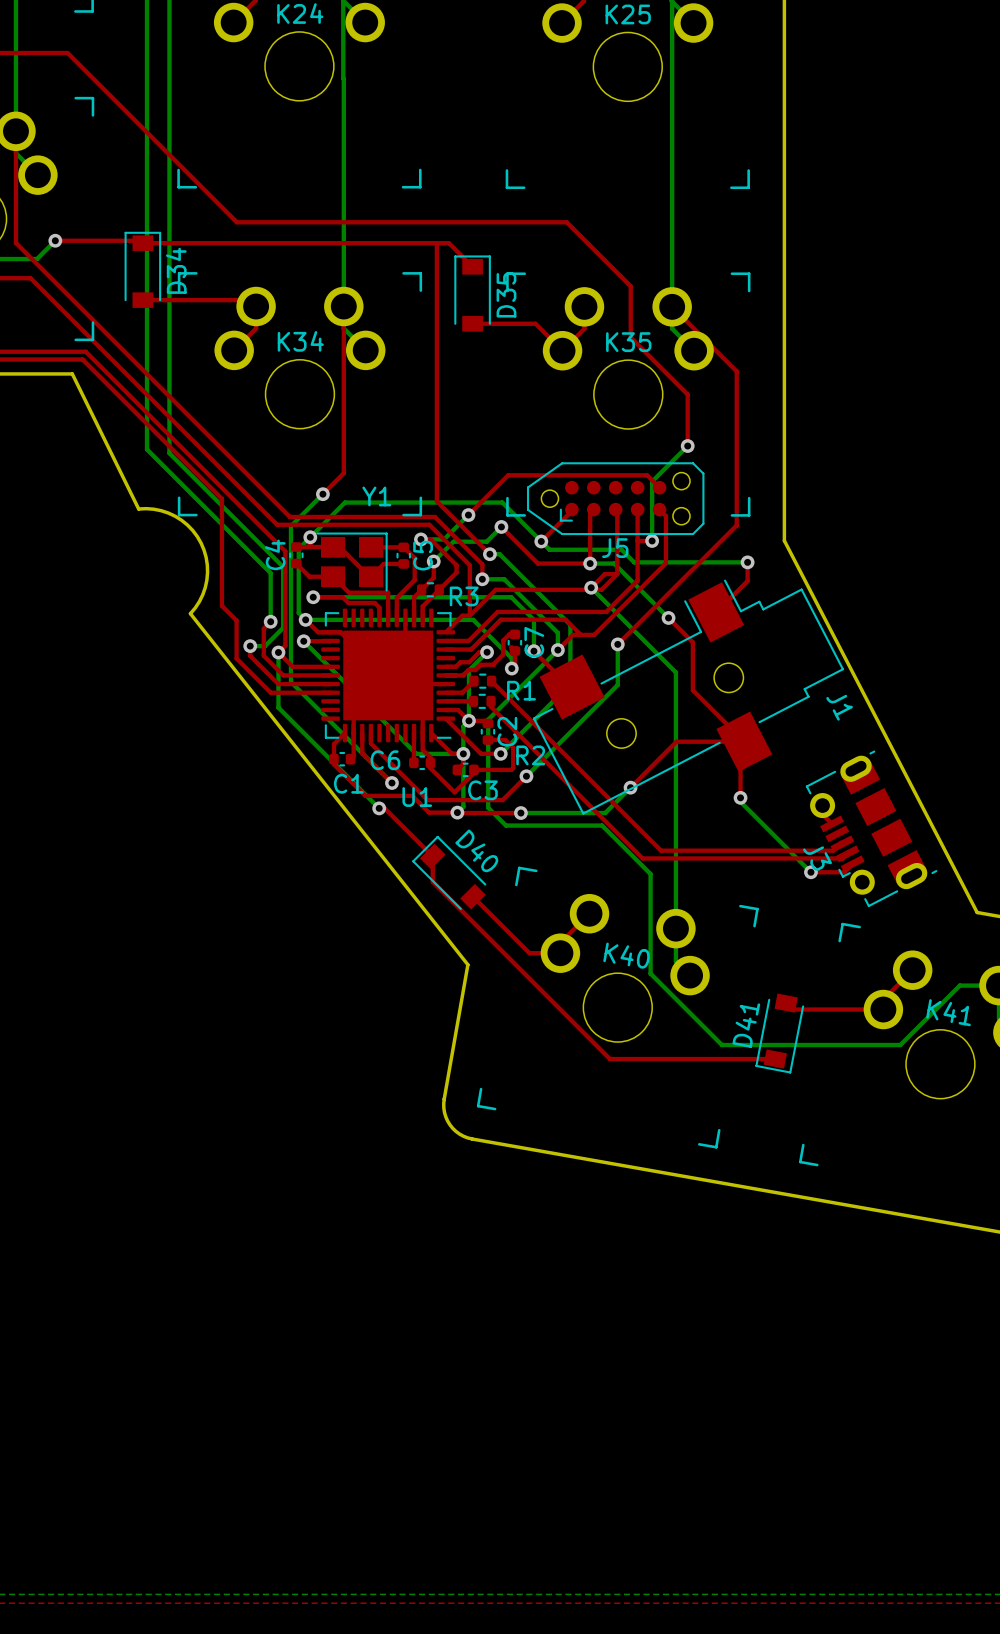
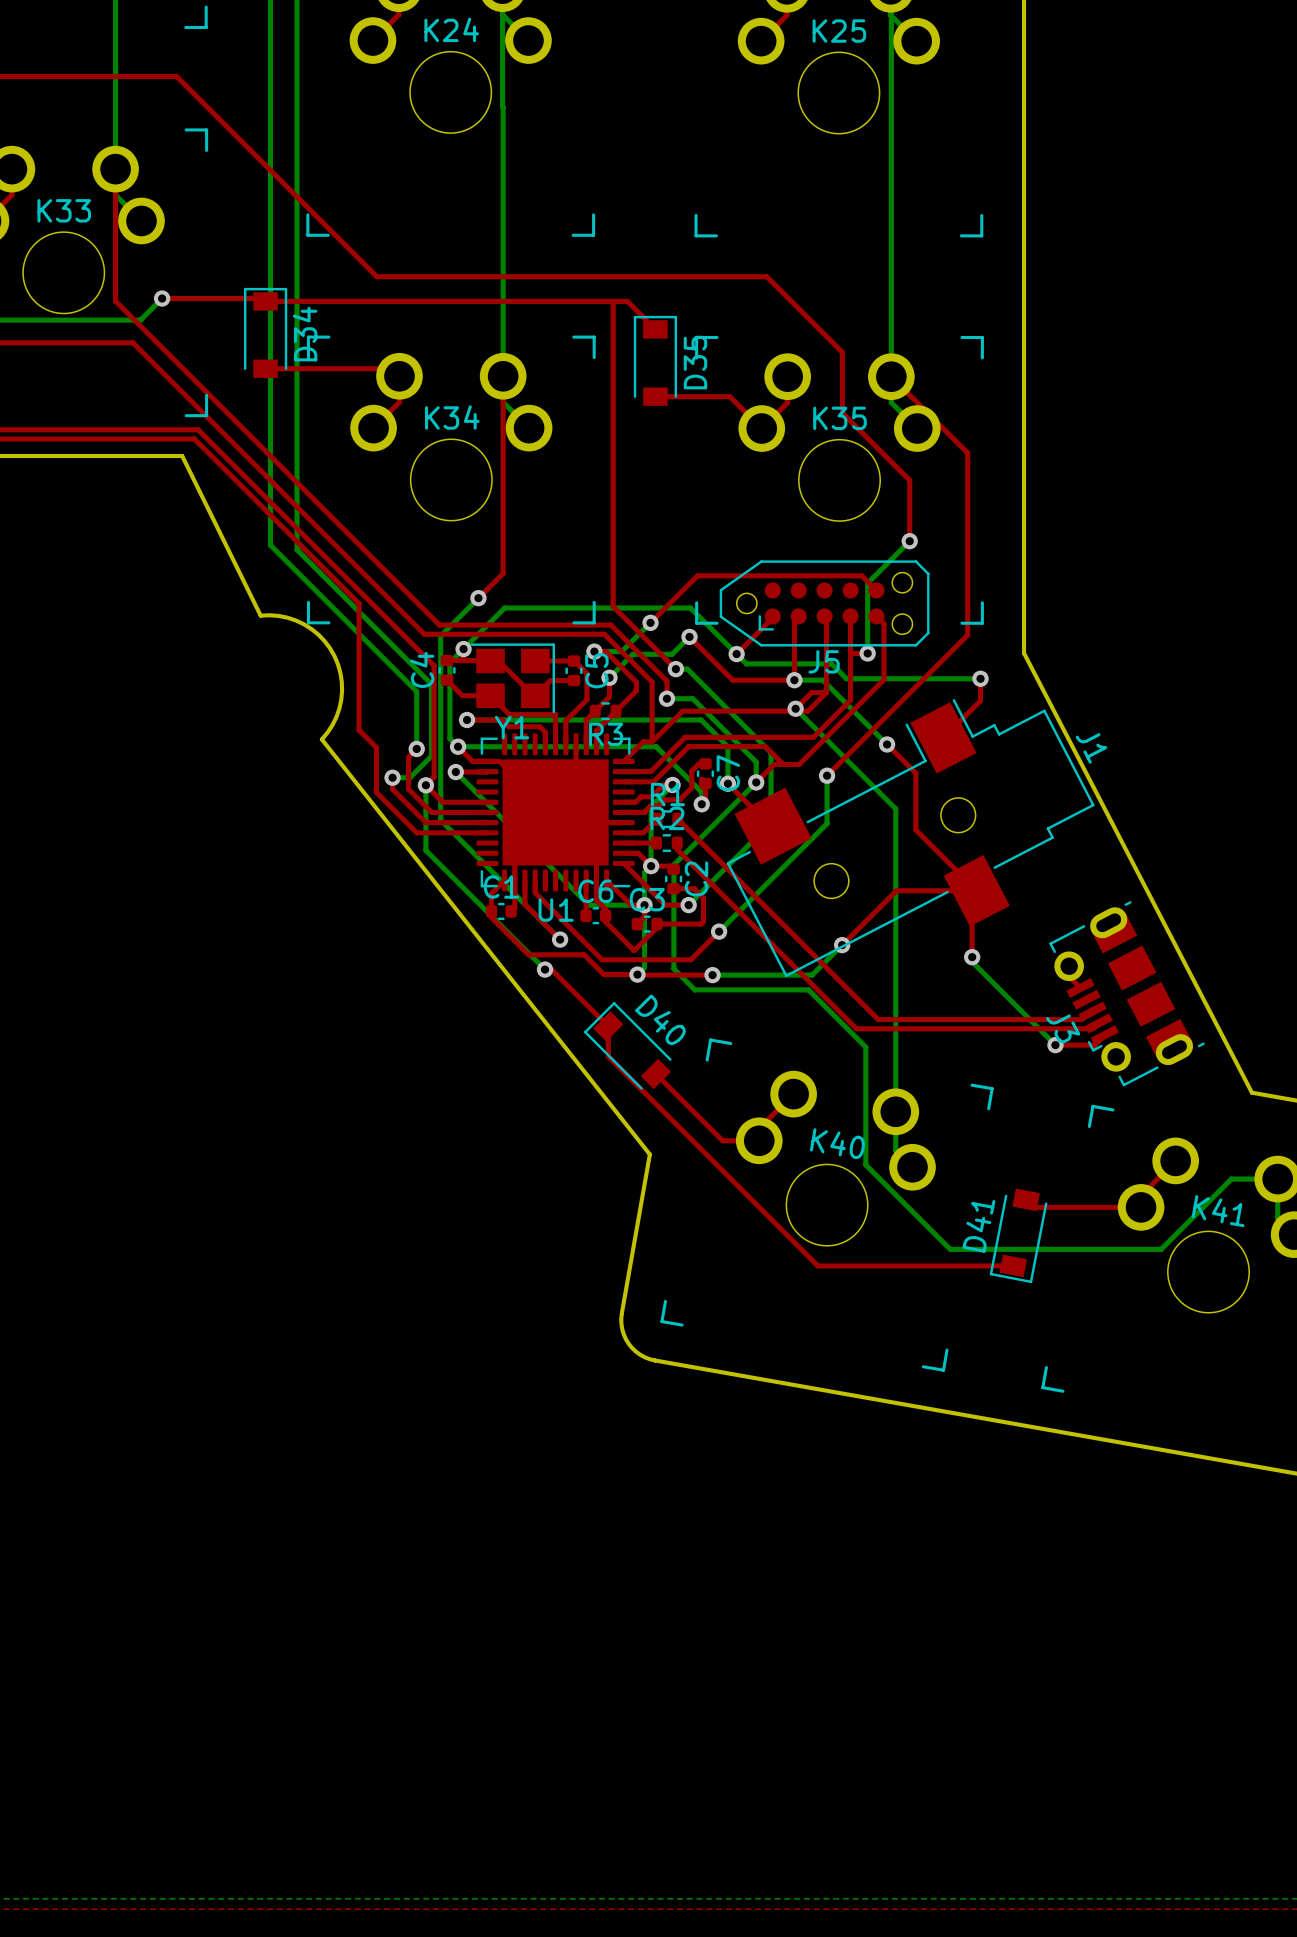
Y1 name position: Y1 (376, 496) -> Y1 (511, 727)
R3 name position: R3 (464, 596) -> R3 (606, 734)
R1 name position: R1 (521, 690) -> R1 (667, 794)
J1 name position: J1 (839, 707) -> J1 (1091, 748)
R2 name position: R2 (530, 755) -> R2 (667, 818)
C6 name position: C6 (385, 760) -> C6 (595, 891)
C1 name position: C1 (348, 783) -> C1 (501, 886)
C3 name position: C3 (482, 790) -> C3 (647, 899)
U1 name position: U1 (417, 797) -> U1 (556, 910)

